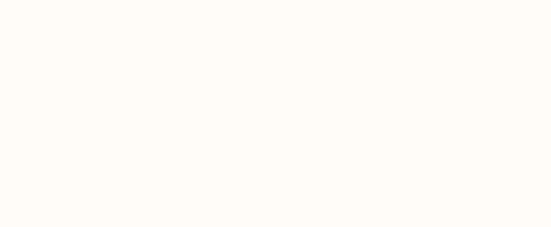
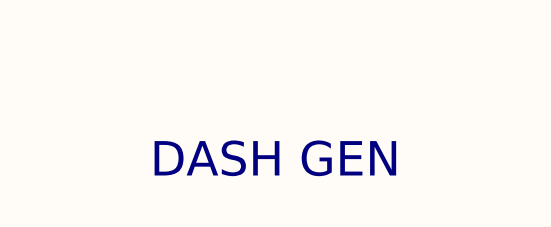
text: none -> DASH GEN (275, 158)

